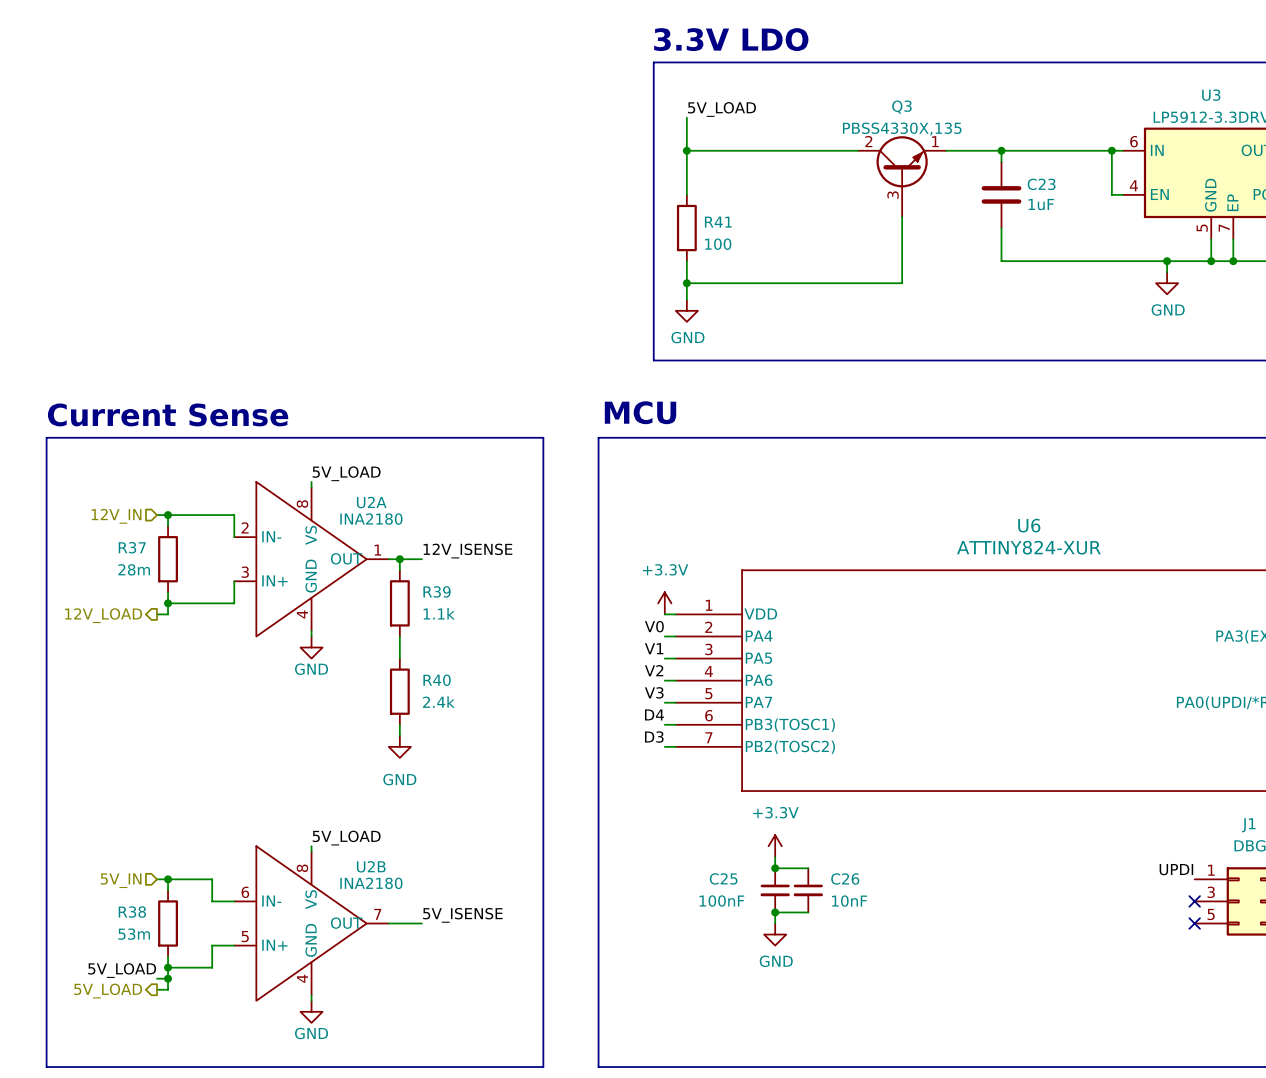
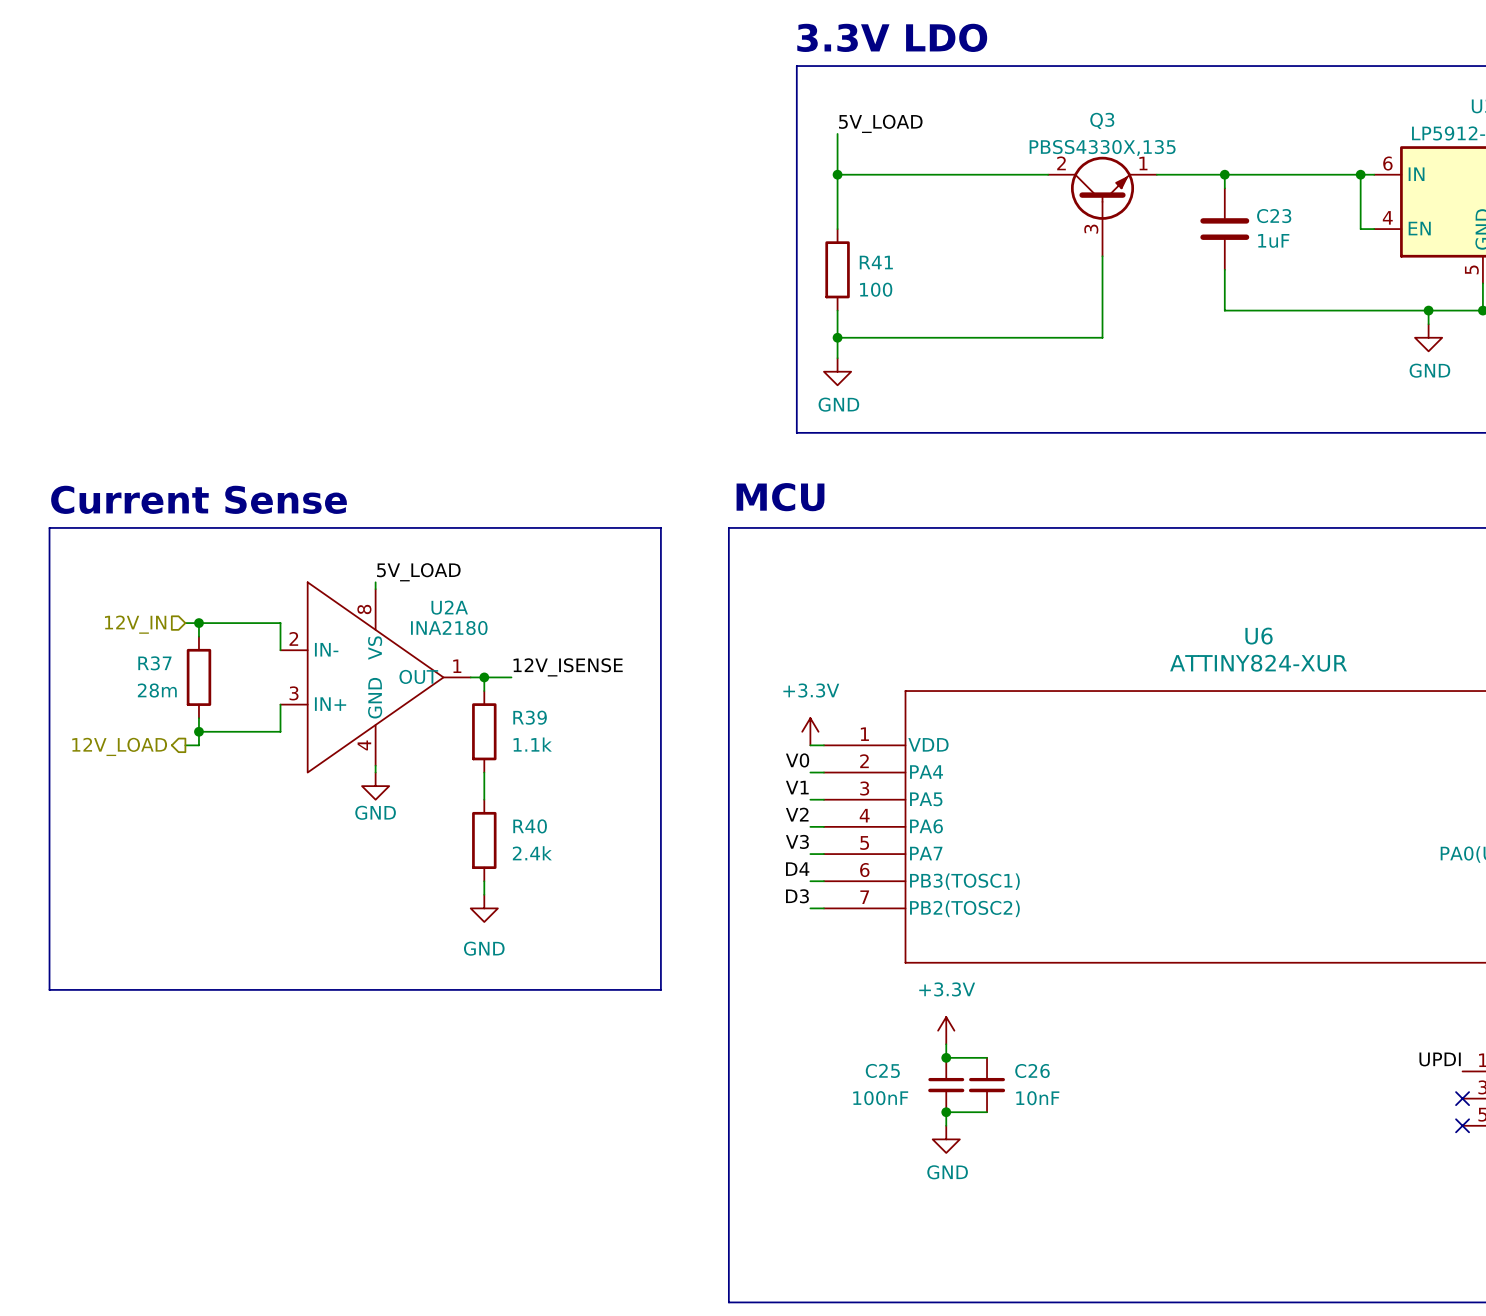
line: (46, 813) (46, 1067) (543, 1067) (543, 813) -> (49, 989) (660, 989)
label: 5V_LOAD (346, 838) -> none
wire: (311, 846) (311, 851) -> none
wire: (156, 879) (212, 879) (212, 901) (234, 901) -> none
wire: (168, 879) (168, 890) -> none
junction: (168, 879) -> none
hierarchical label: 5V_IN (121, 880) -> none
label: 5V_ISENSE (462, 915) -> none
R38: 53m (168, 923) -> none
U2B: INA2180 (311, 923) -> none
wire: (388, 923) (421, 923) -> none
wire: (234, 945) (212, 945) (212, 967) (168, 967) -> none
wire: (168, 956) (168, 989) (156, 989) -> none
junction: (168, 967) -> none
label: 5V_LOAD (122, 970) -> none
wire: (156, 978) (168, 978) -> none
junction: (168, 978) -> none
hierarchical label: 5V_LOAD (108, 991) -> none
wire: (311, 995) (311, 1000) -> none
power symbol: GND (311, 1011) -> none

